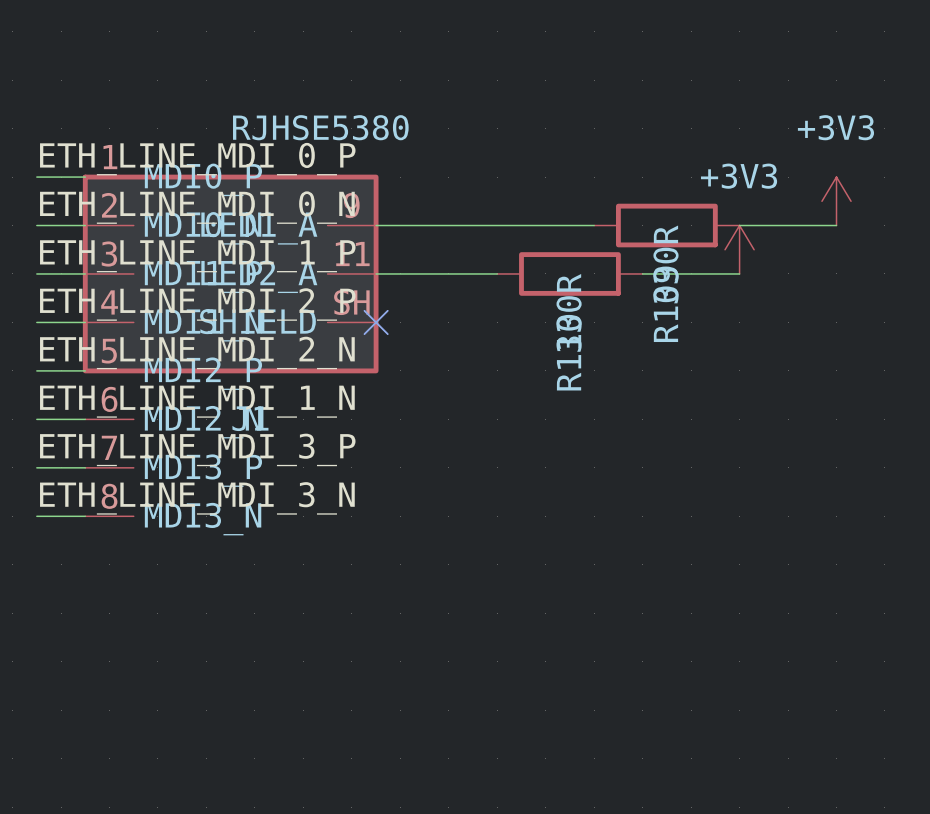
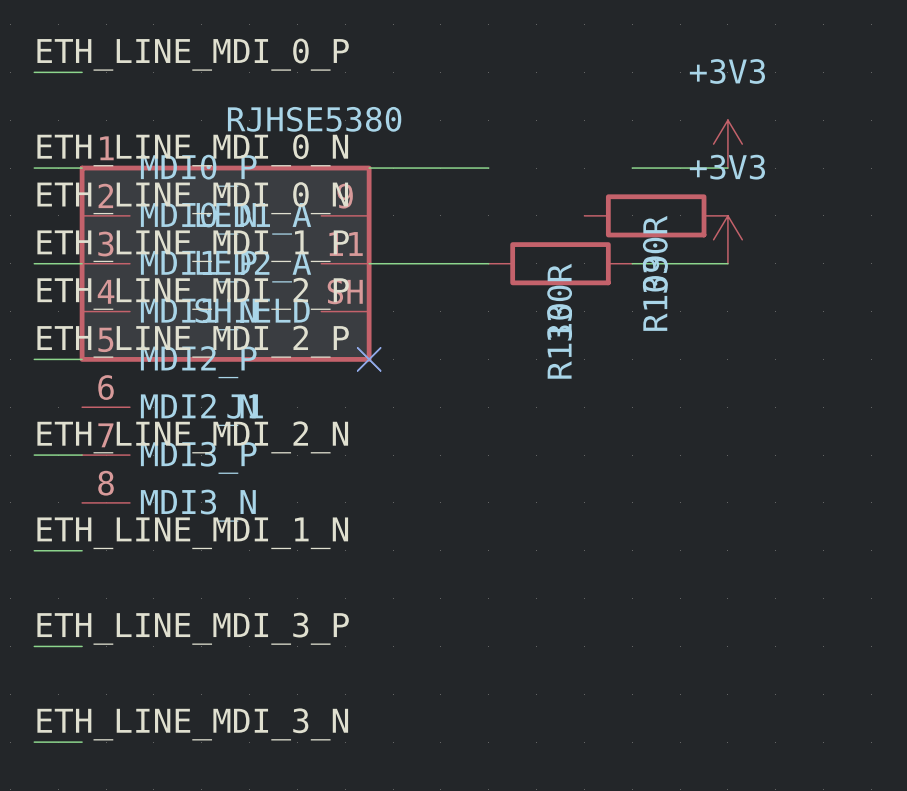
label: none -> ETH_LINE_MDI_0_P (193, 54)
label: ETH_LINE_MDI_0_P (197, 159) -> ETH_LINE_MDI_0_N (192, 150)
wire: none -> (369, 168) (488, 168)
power symbol position: +3V3 (836, 201) -> +3V3 (727, 144)
wire: (36, 225) (85, 225) -> (34, 72) (82, 72)
wire: (376, 225) (594, 225) -> none
wire: (739, 225) (836, 225) -> (632, 168) (727, 168)
wire: (36, 322) (85, 322) -> (34, 550) (82, 550)
no-connect mark position: (376, 322) -> (369, 359)
label: ETH_LINE_MDI_2_N (197, 352) -> ETH_LINE_MDI_2_P (193, 341)
label position: ETH_LINE_MDI_1_N (197, 401) -> ETH_LINE_MDI_1_N (192, 533)
wire: (36, 419) (85, 419) -> (34, 646) (82, 646)
label: ETH_LINE_MDI_3_P (197, 449) -> ETH_LINE_MDI_2_N (192, 437)
label position: ETH_LINE_MDI_3_N (197, 498) -> ETH_LINE_MDI_3_N (192, 724)
wire: (36, 516) (85, 516) -> (34, 742) (82, 742)
label: none -> ETH_LINE_MDI_3_P (193, 628)

